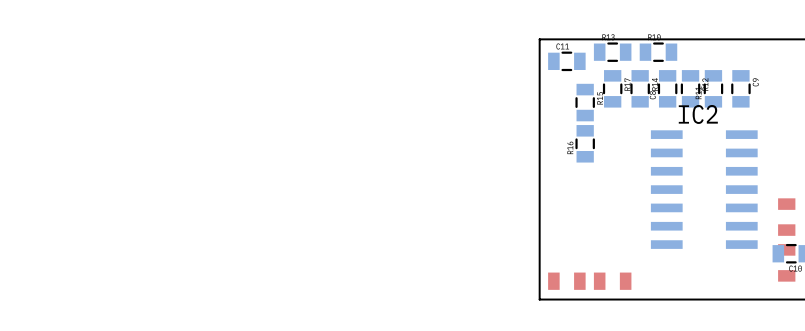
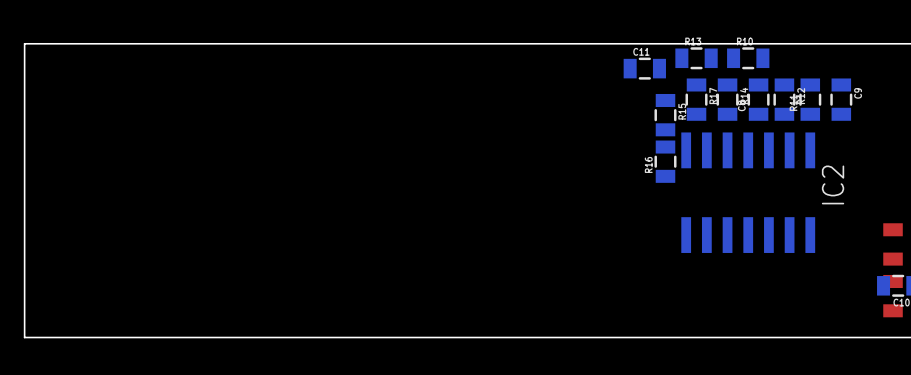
board edge: (539, 39) (539, 299) -> (614, 43) (24, 43) (24, 337) (614, 337)
IC2 rotation: 0° (704, 189) -> 90° clockwise (748, 192)
part: (566, 281) -> none
part: (612, 281) -> none

